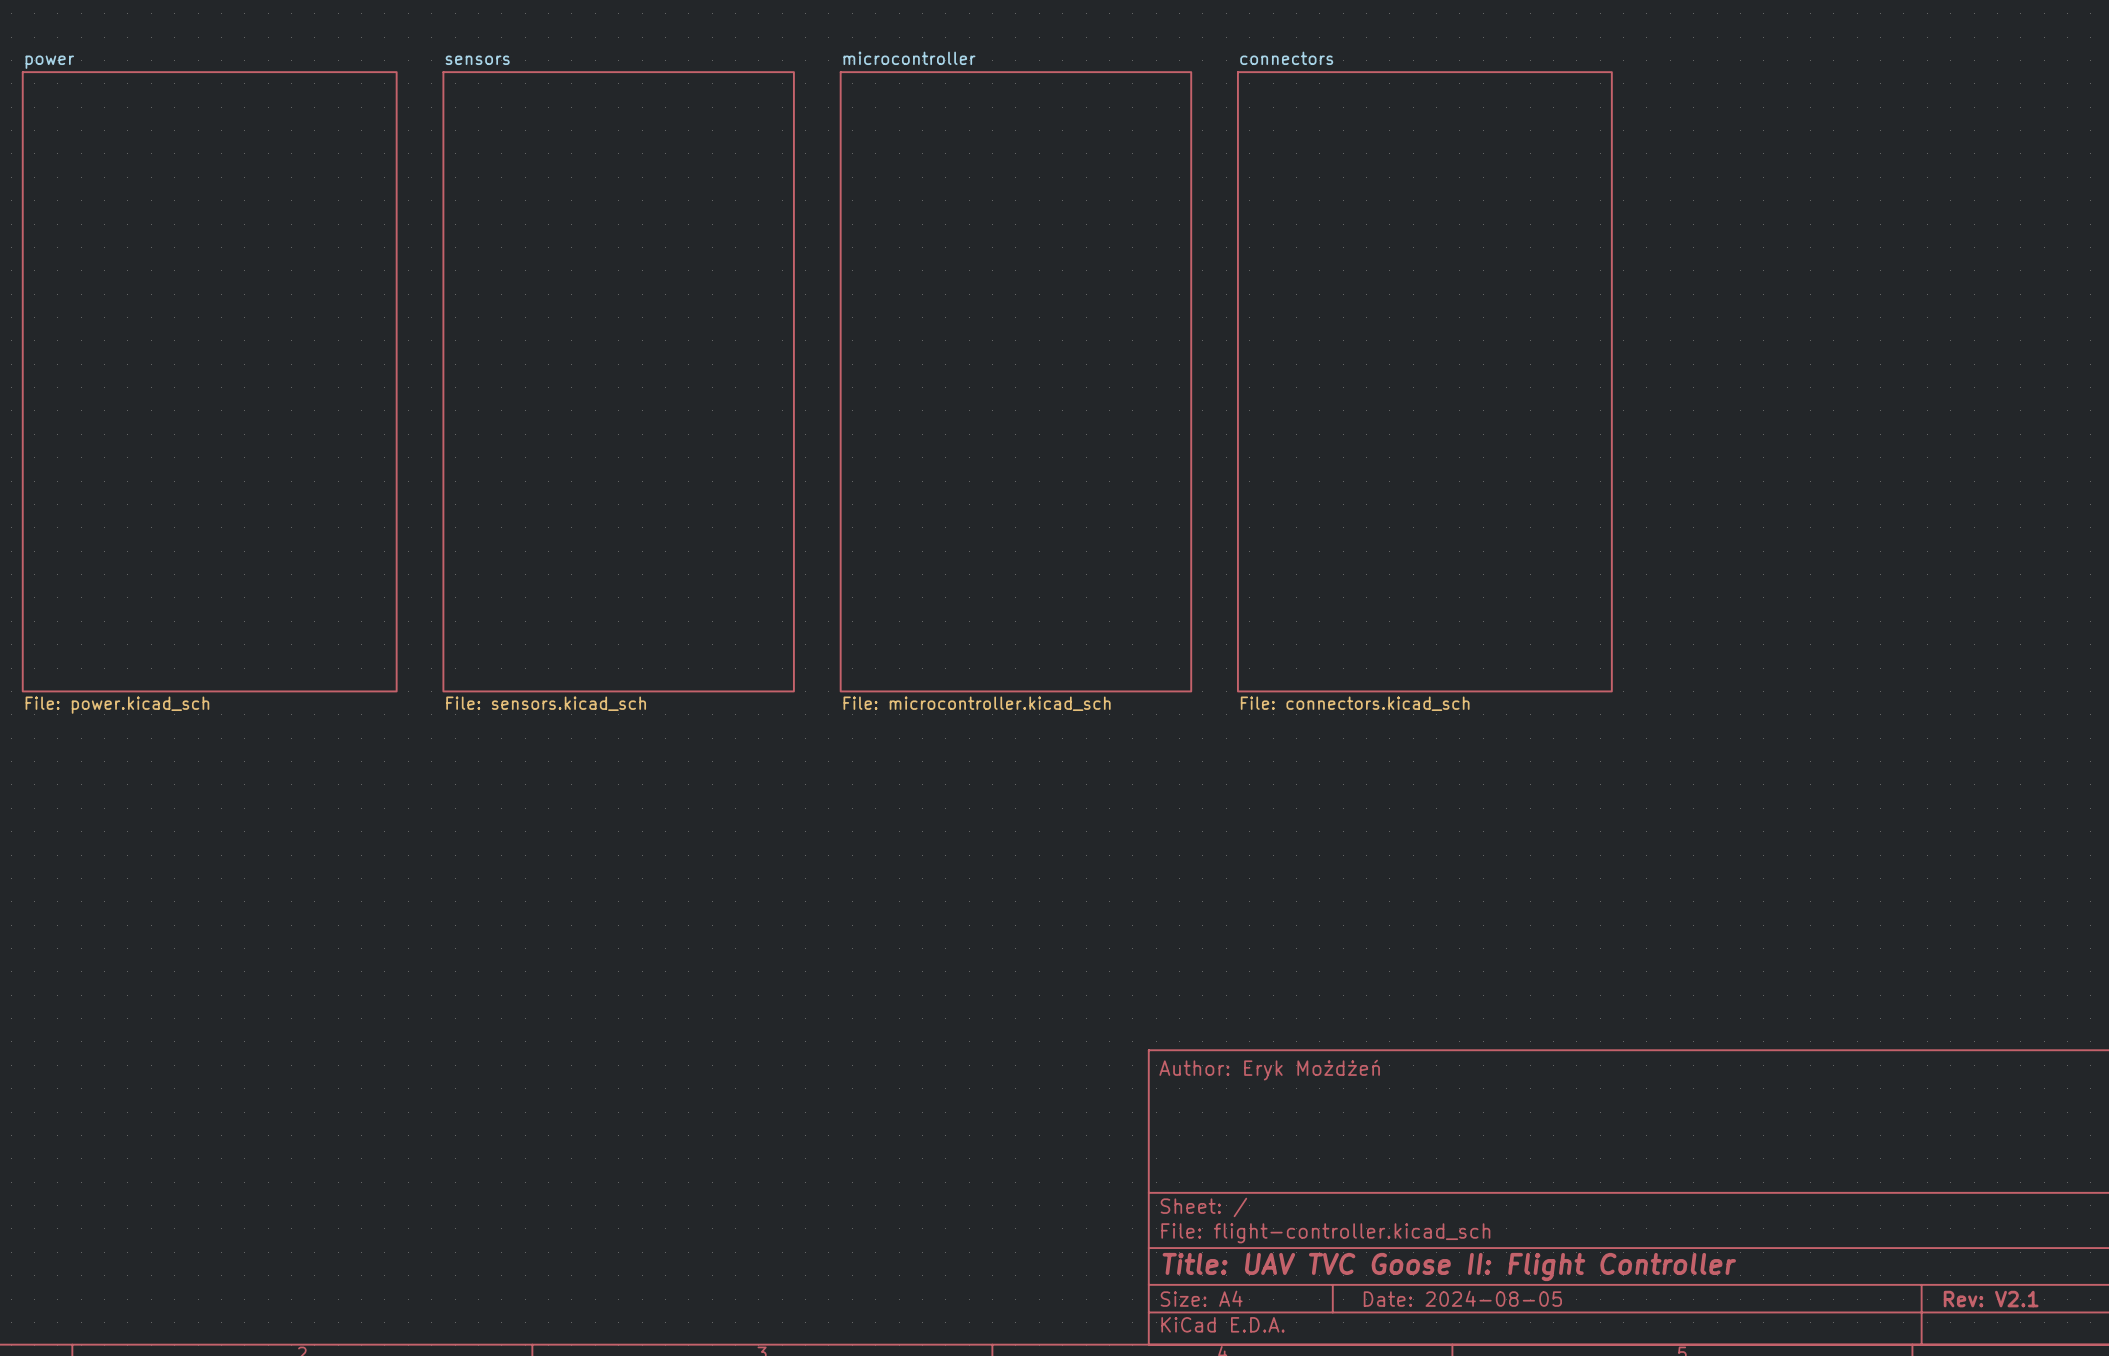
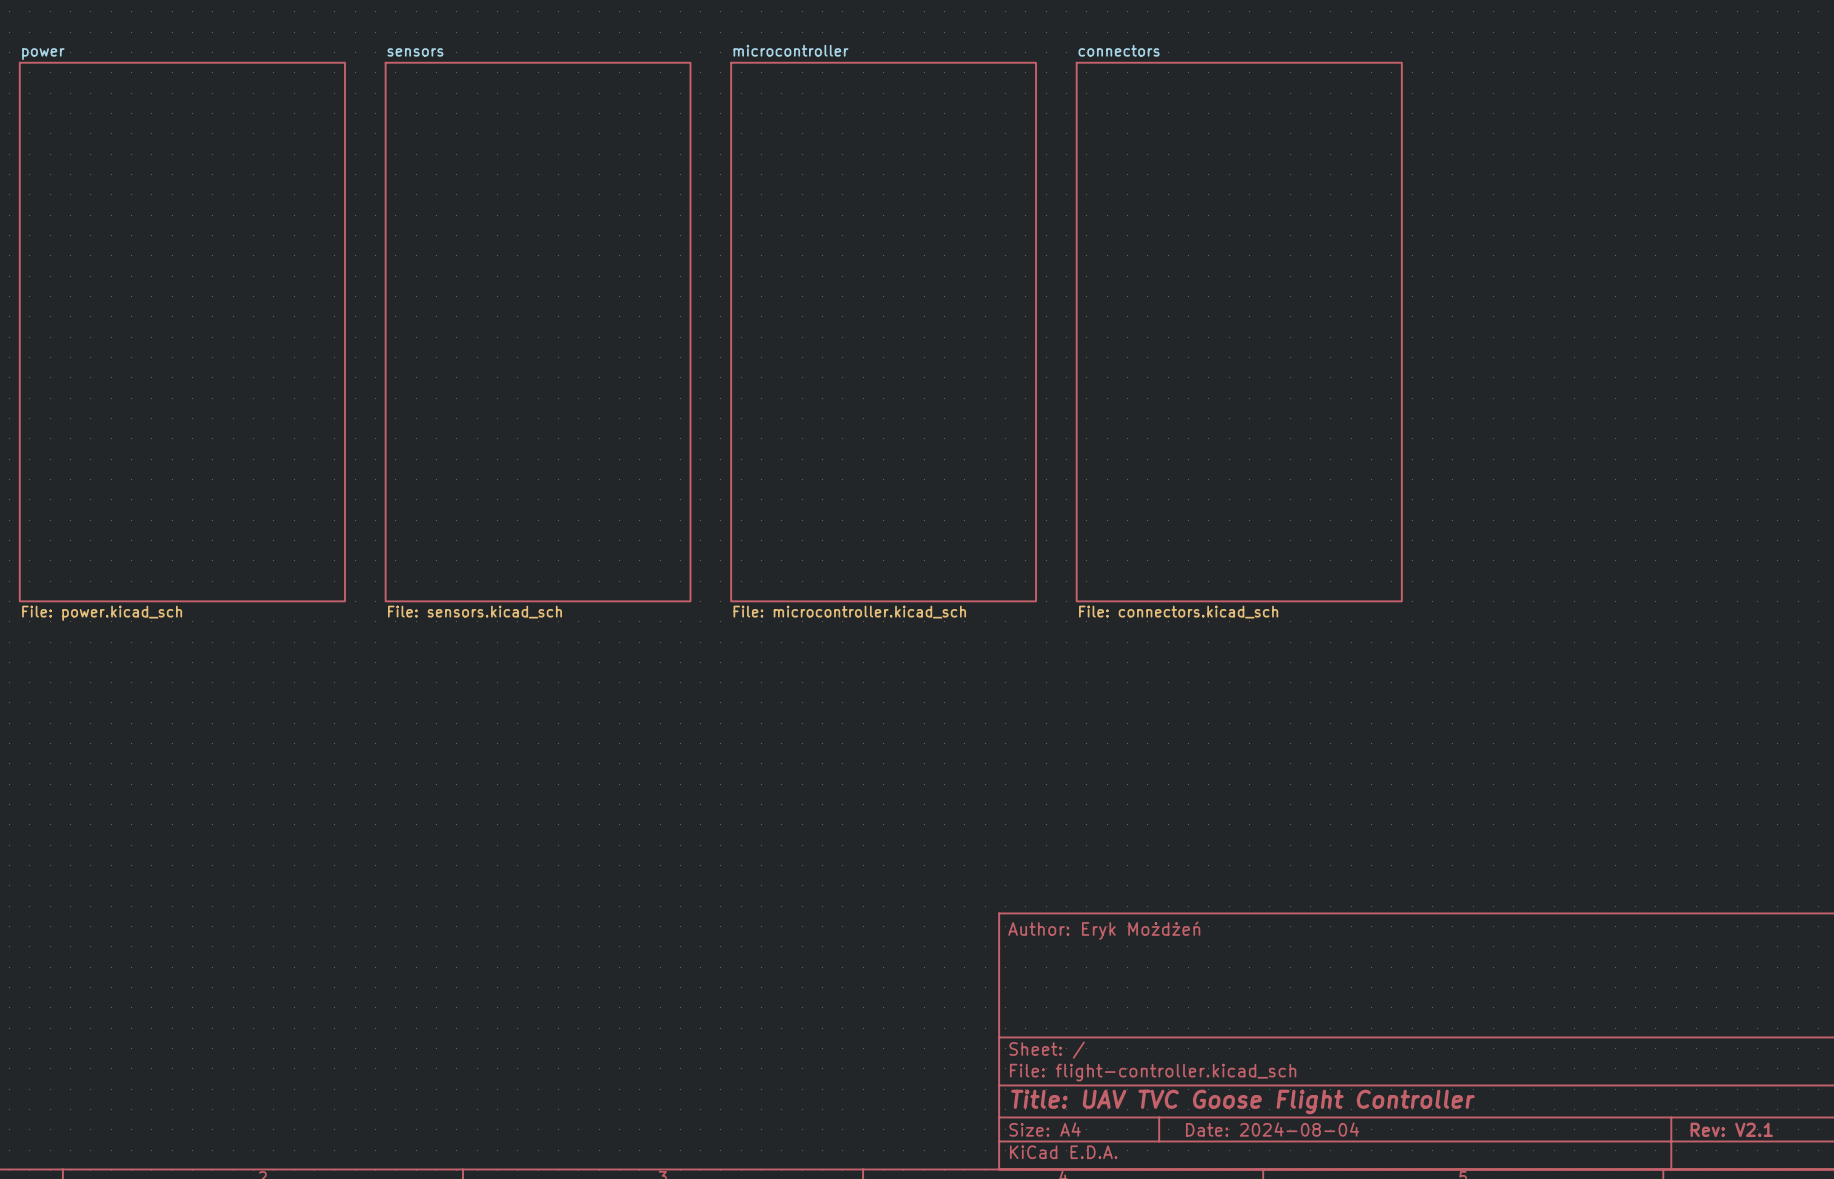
title block: Title: UAV TVC Goose II: Flight Controller (1449, 1266) -> Title: UAV TVC Goose Flight Controller (1242, 1101)
title block: Date: 2024-08-05 (1462, 1298) -> Date: 2024-08-04 (1272, 1129)

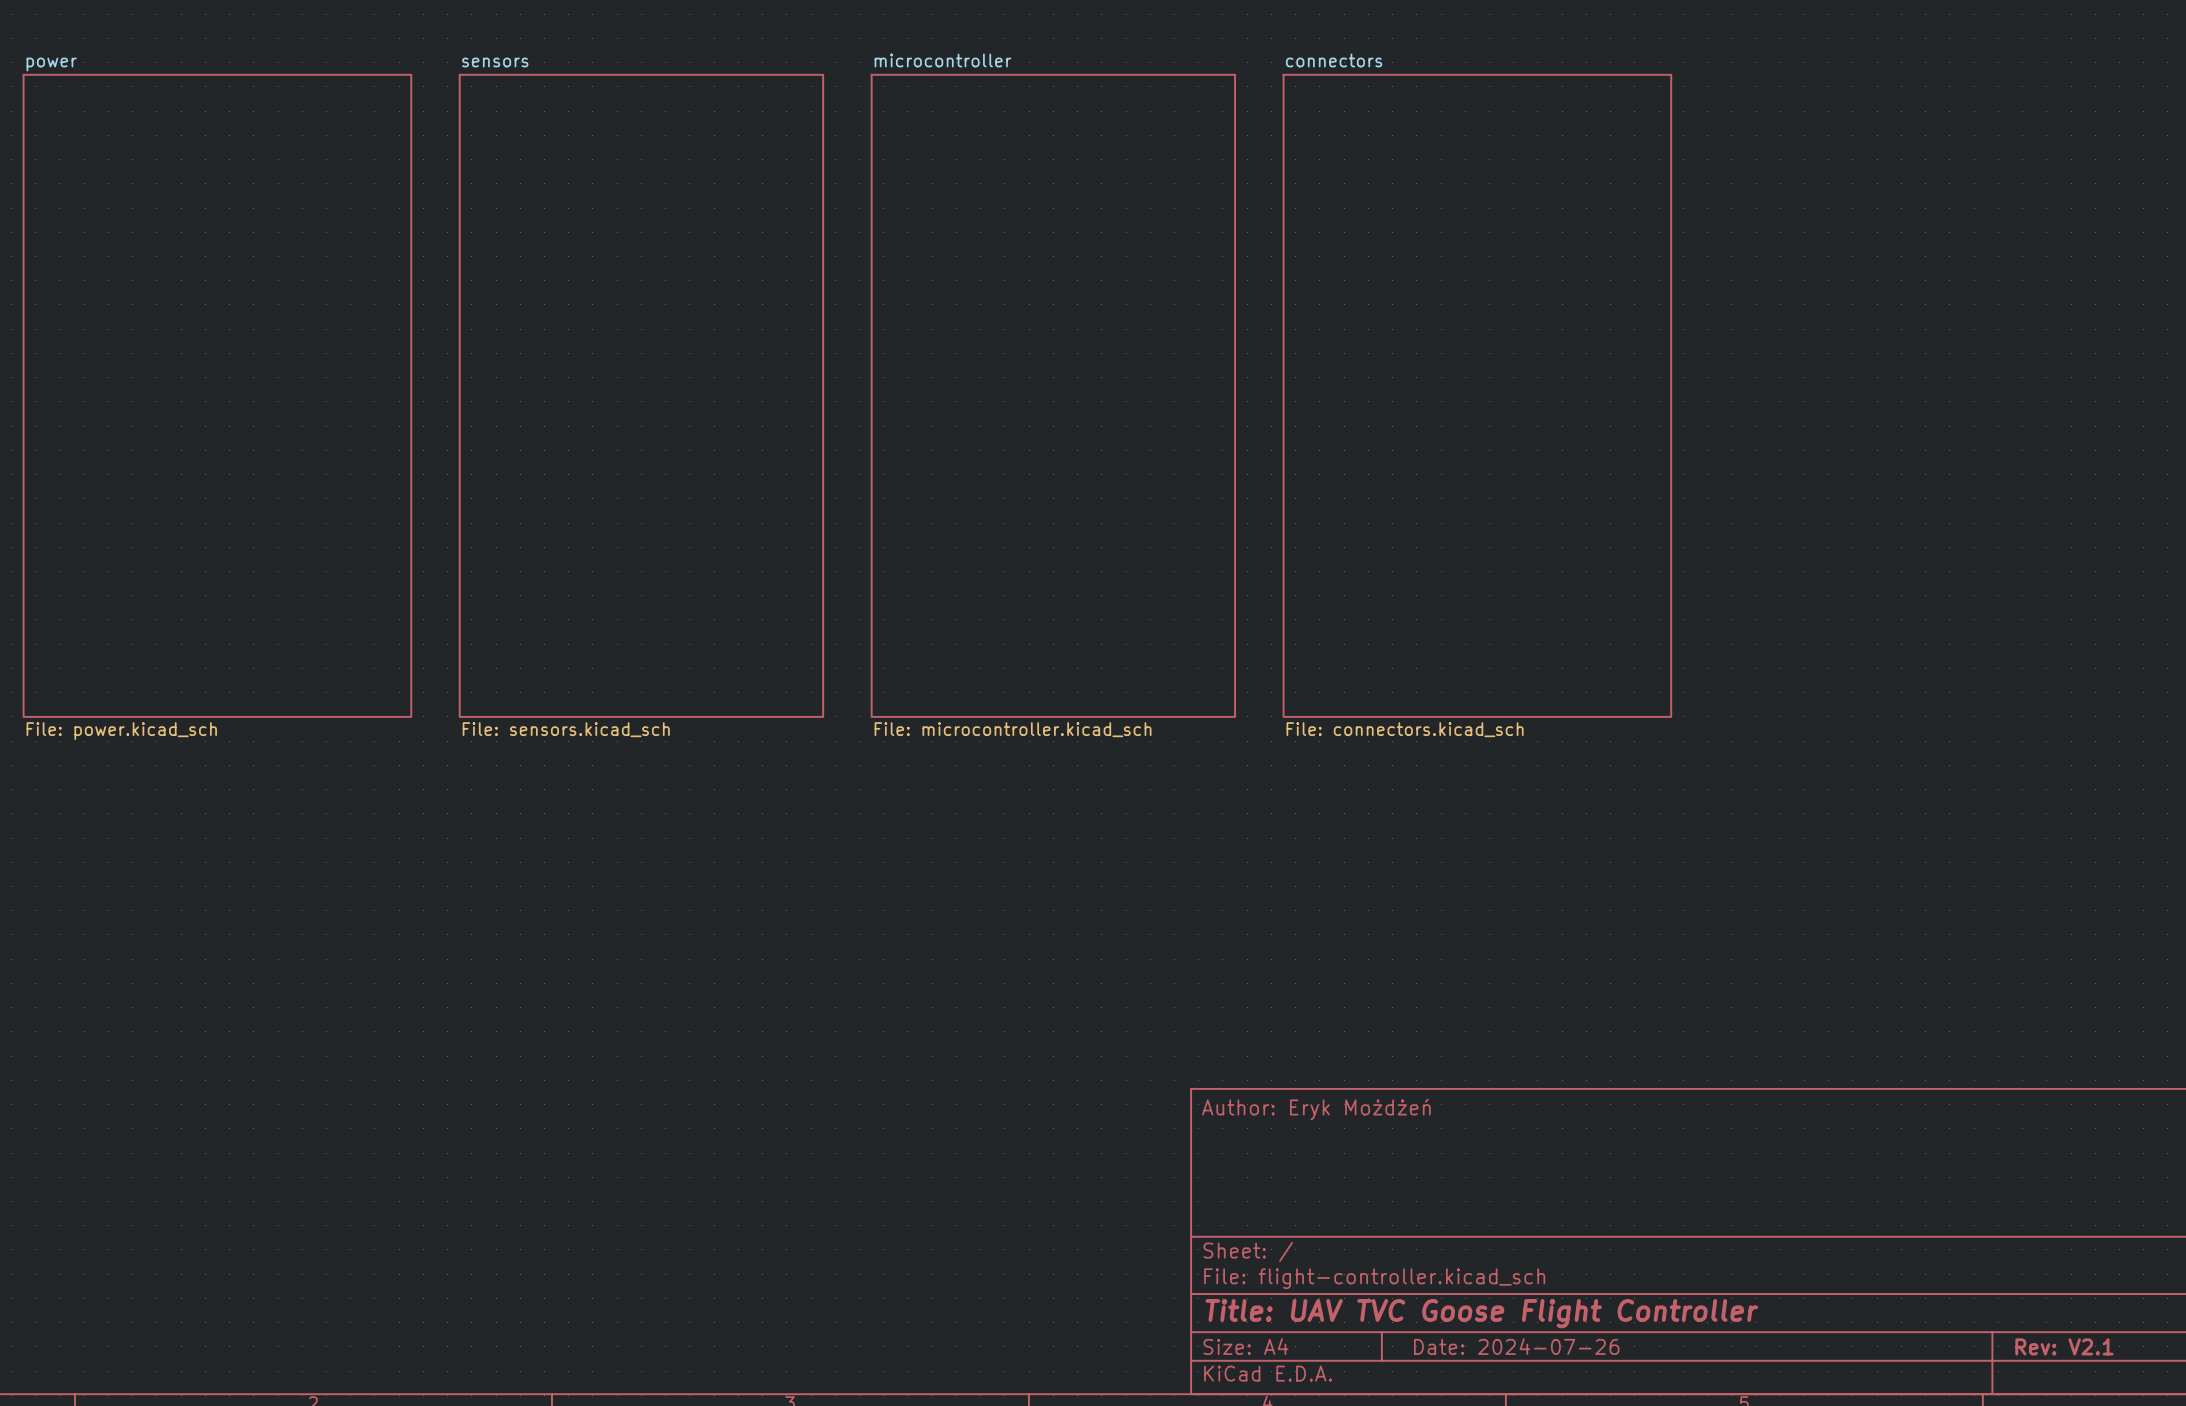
title block: Date: 2024-08-04 (1272, 1129) -> Date: 2024-07-26 (1516, 1346)

